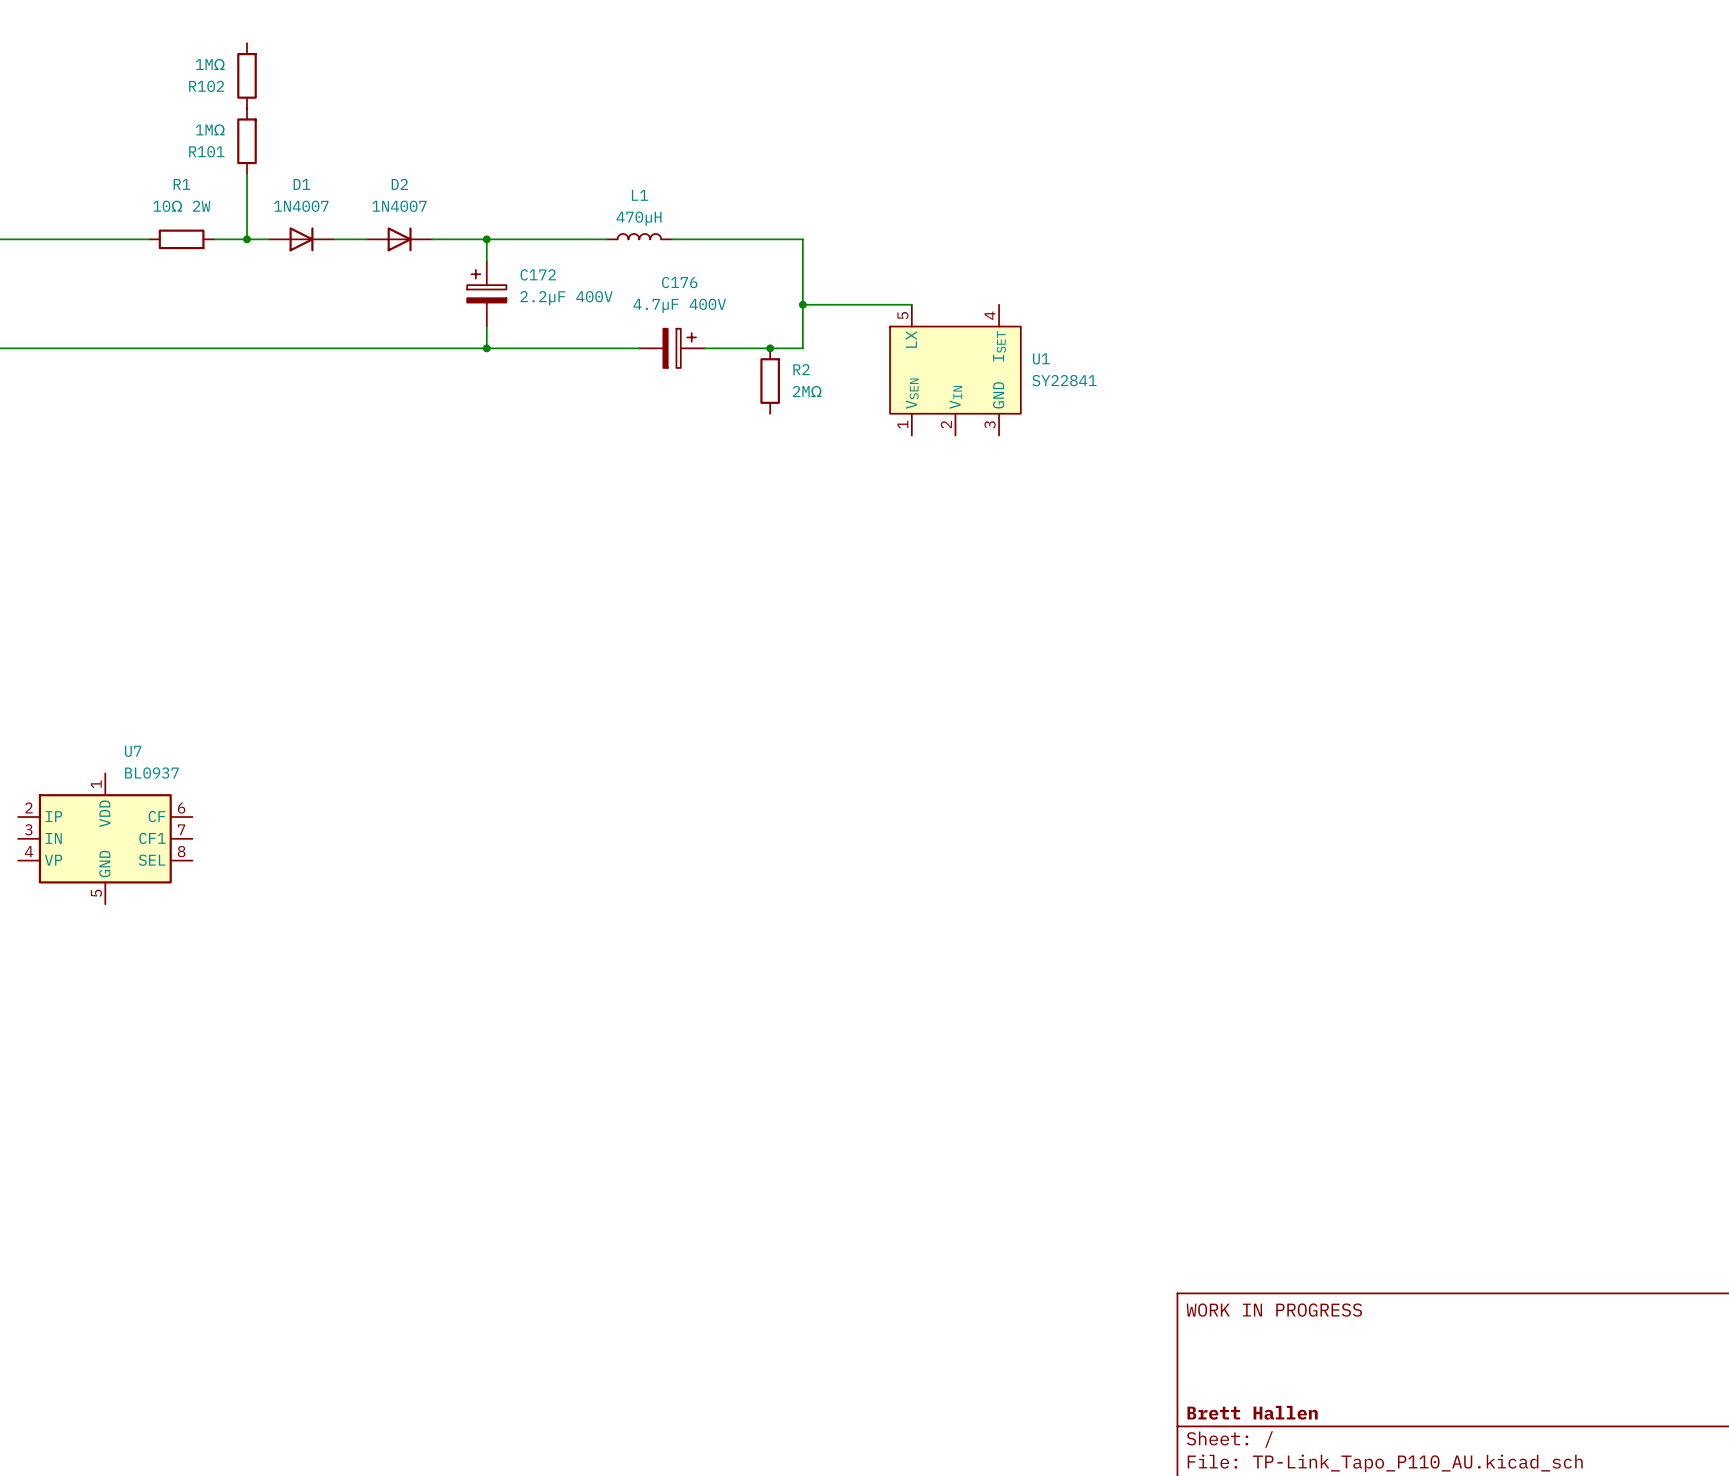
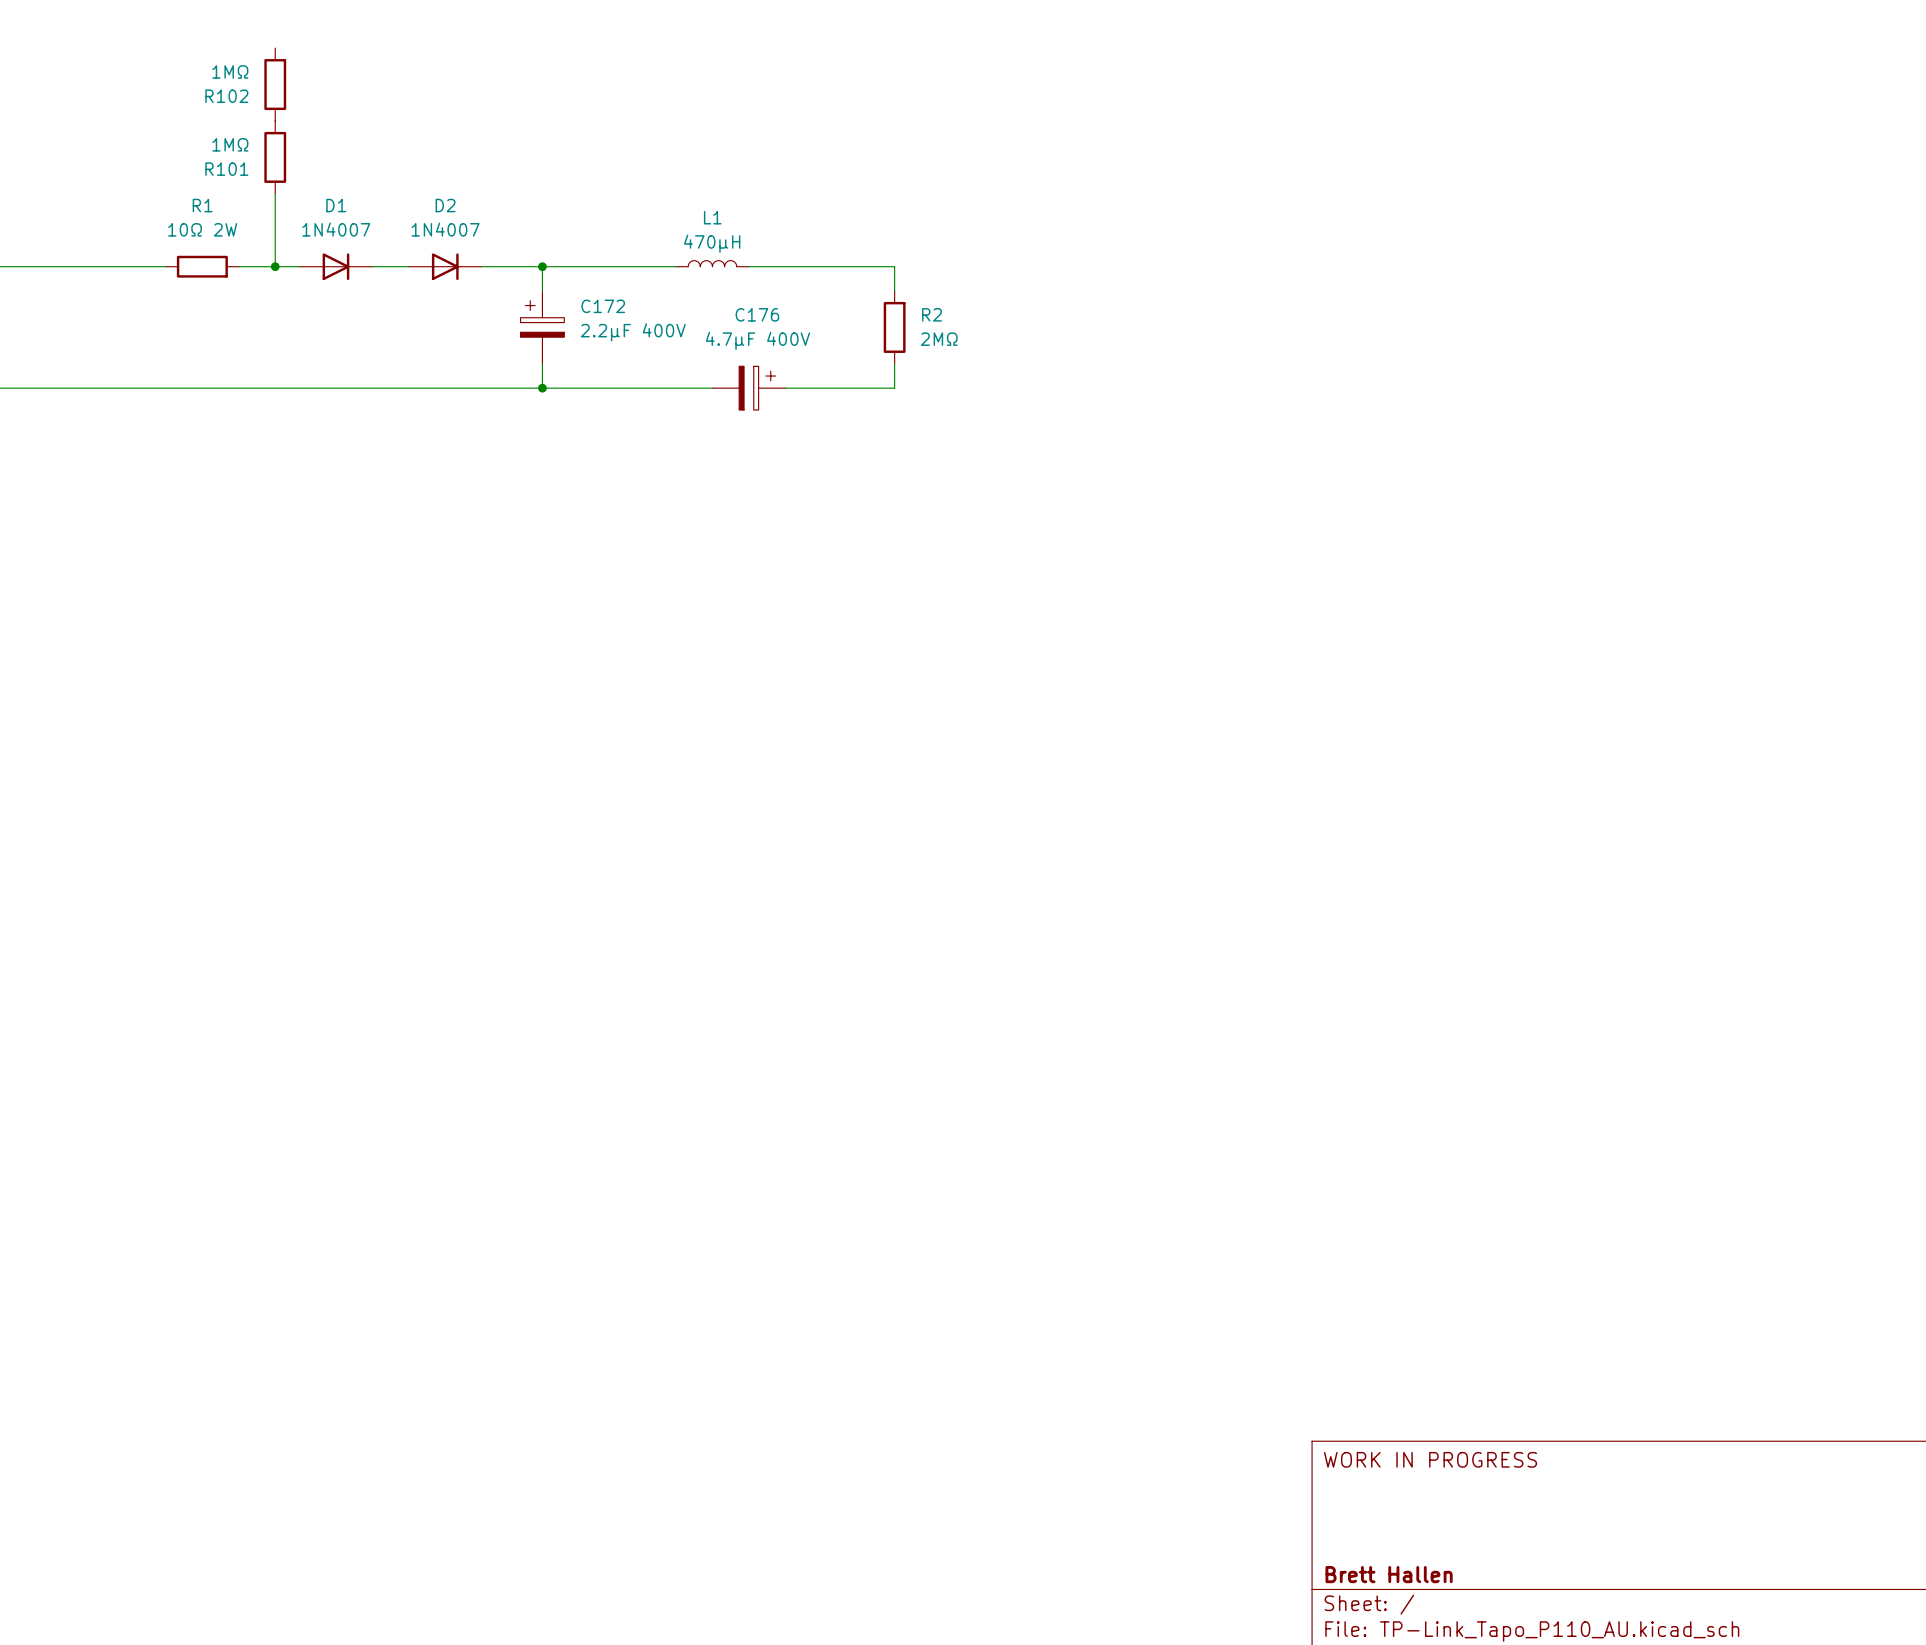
wire: (802, 261) (802, 326) -> none
wire: (802, 304) (911, 304) -> none
junction: (802, 304) -> none
junction: (770, 348) -> none
U1: SY22841 (955, 370) -> none
R2 position: (770, 381) -> (894, 327)
U7: BL0937 (105, 838) -> none

